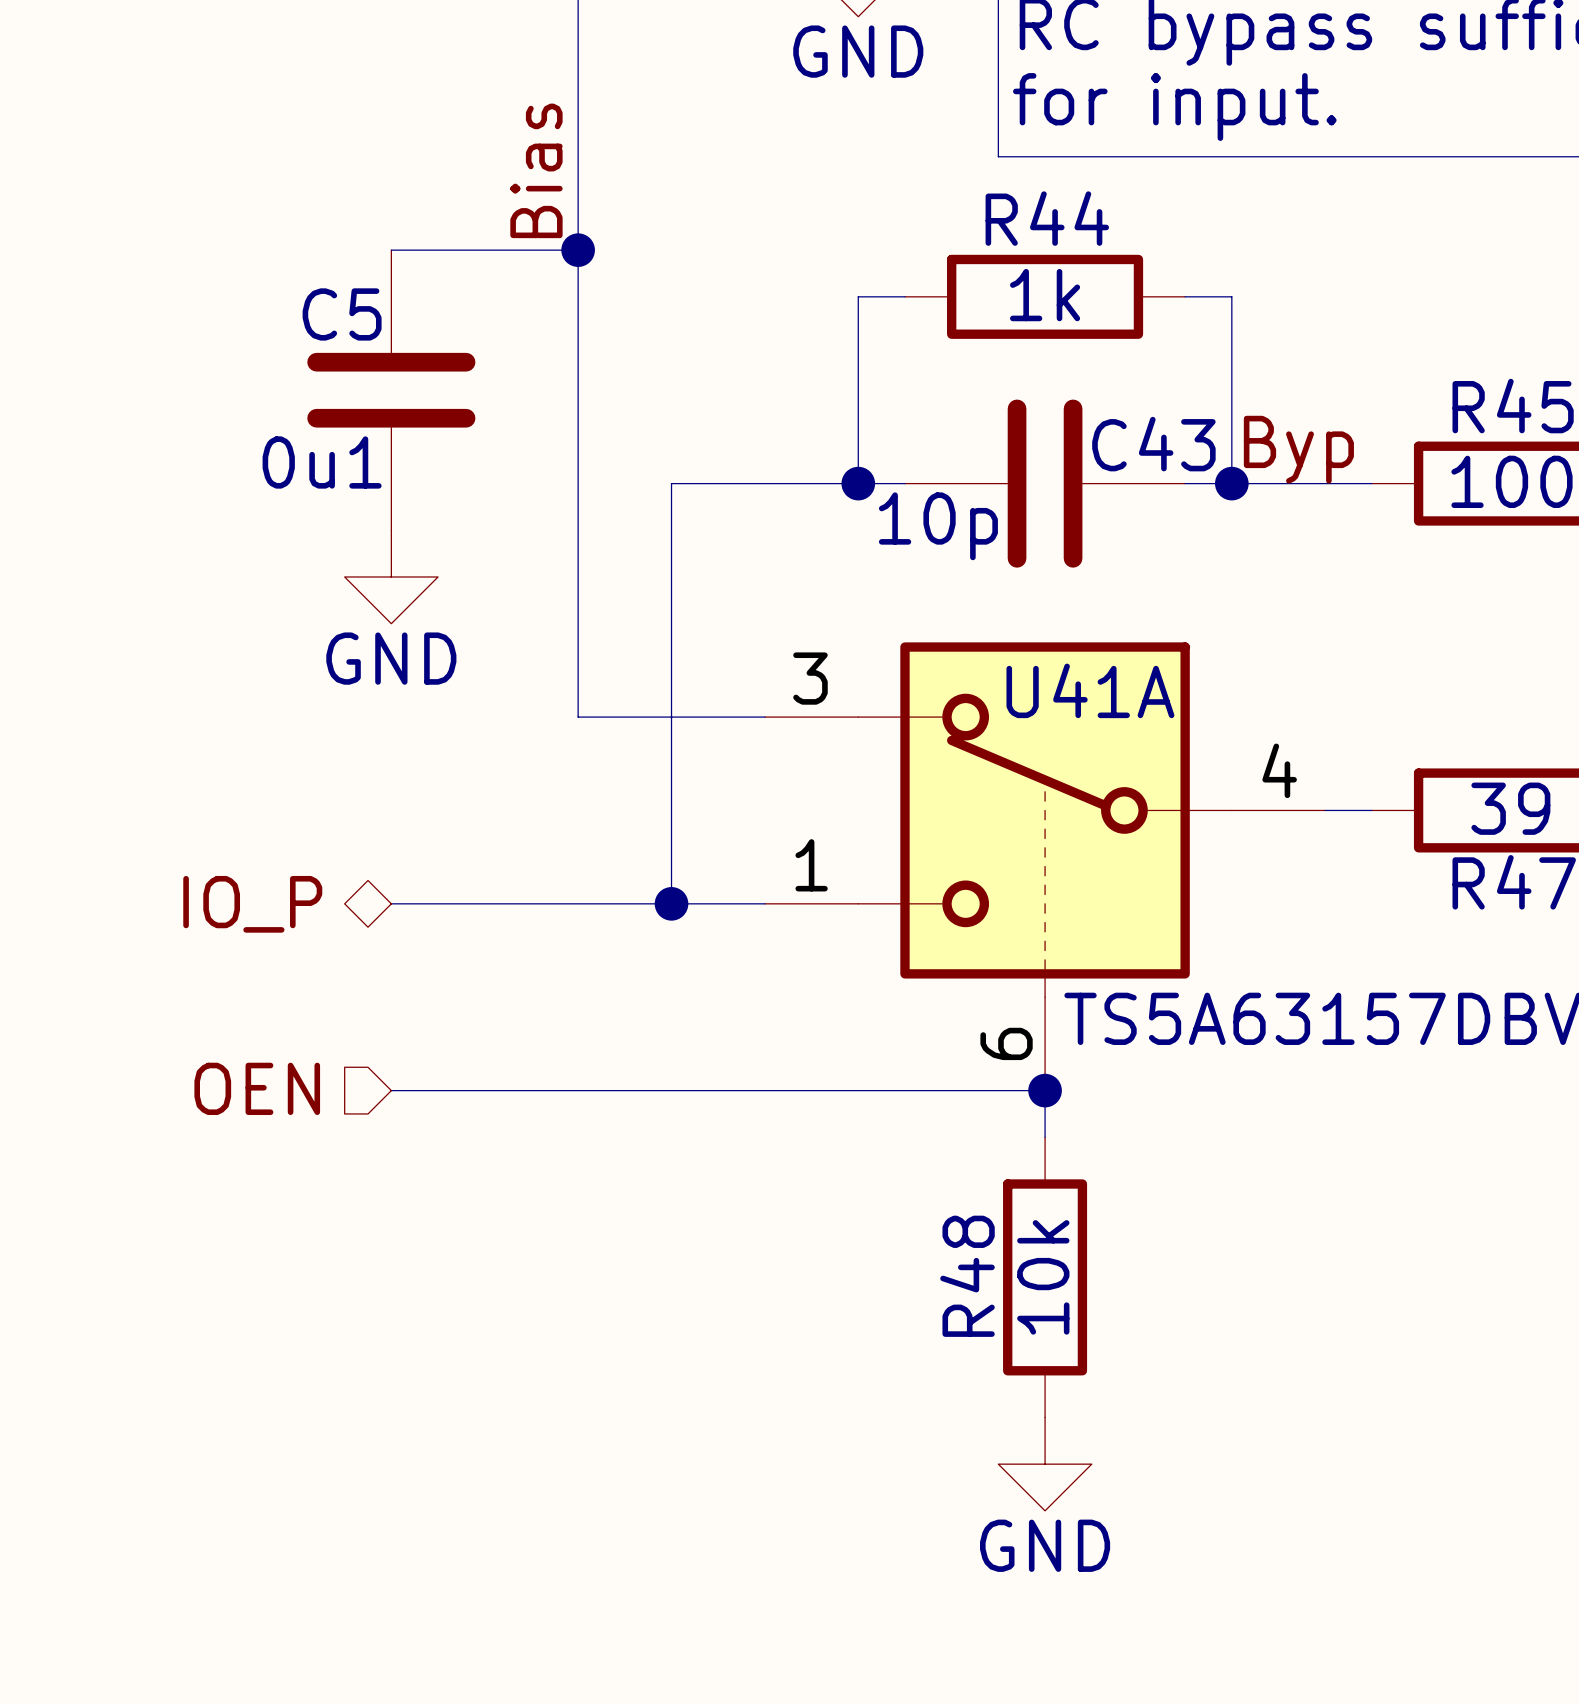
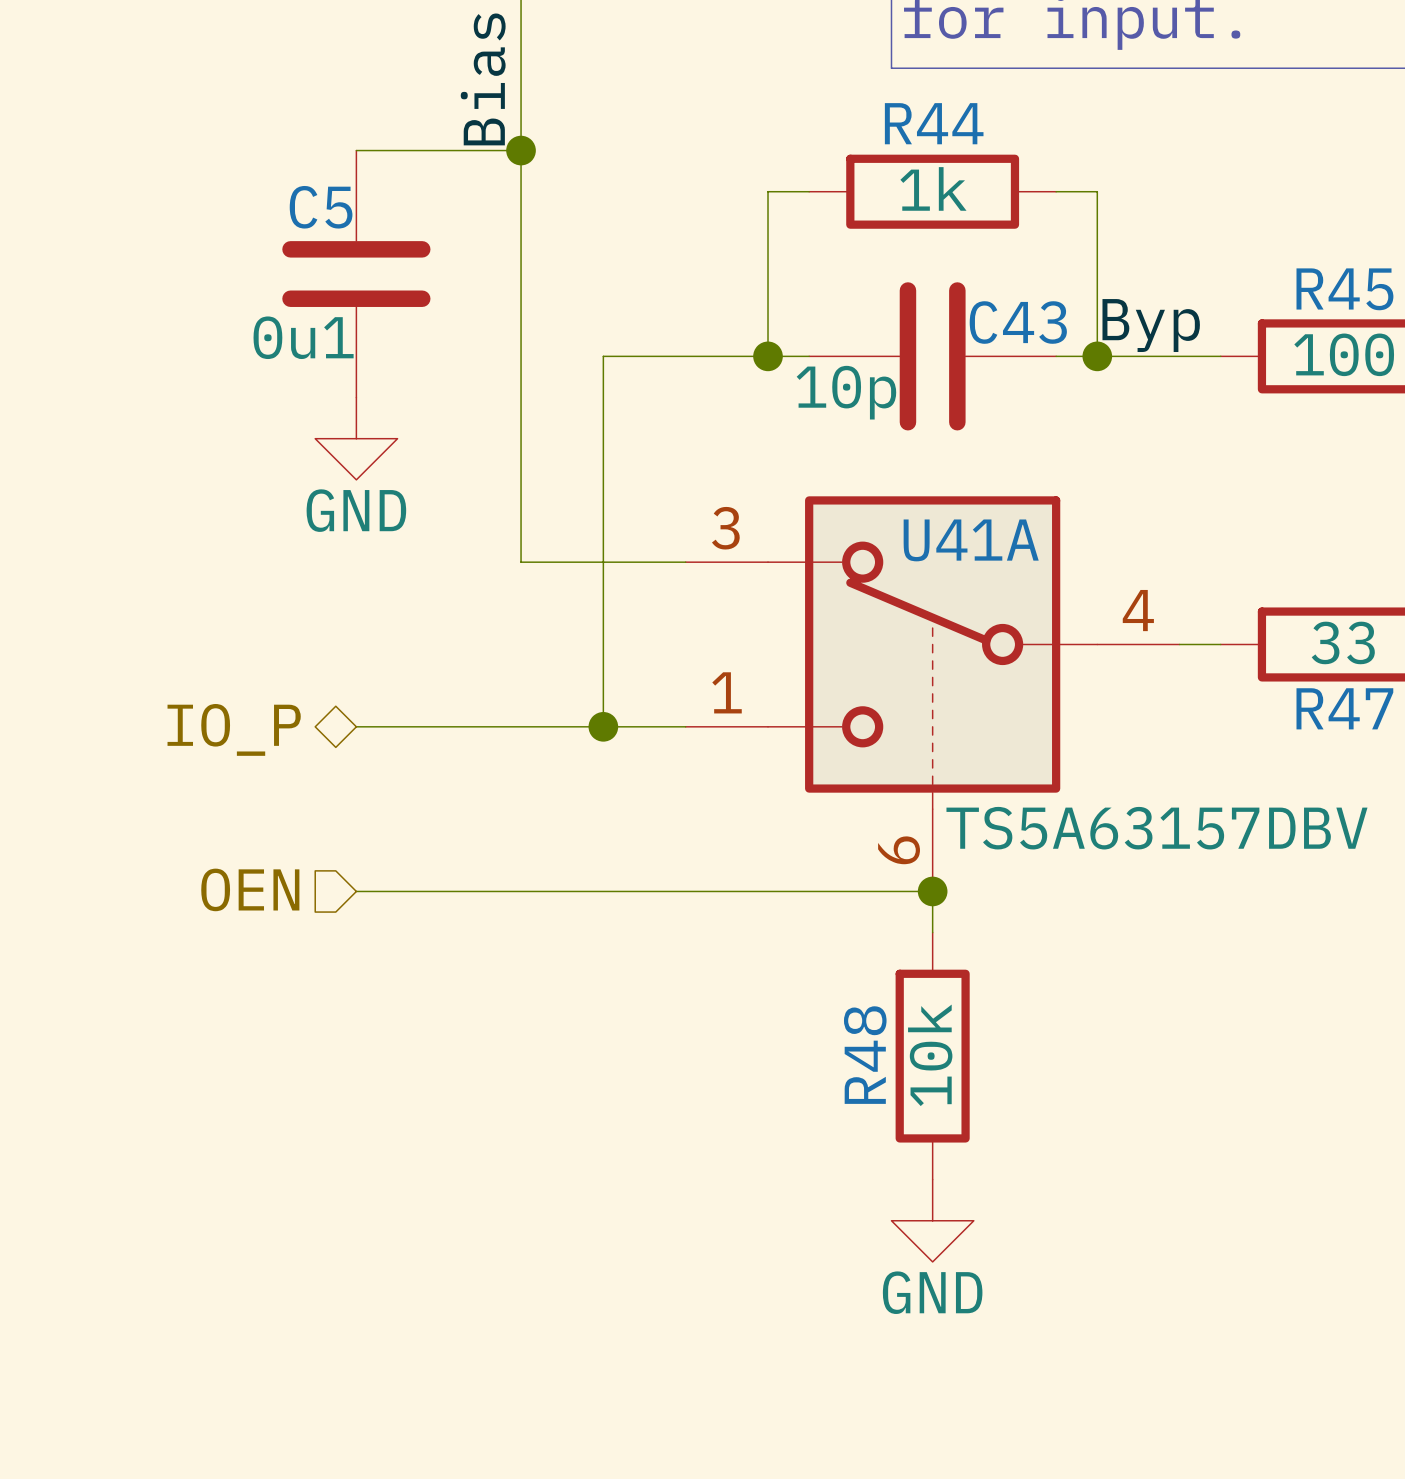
R47 value: 39 (1510, 808) -> 33 (1343, 642)

